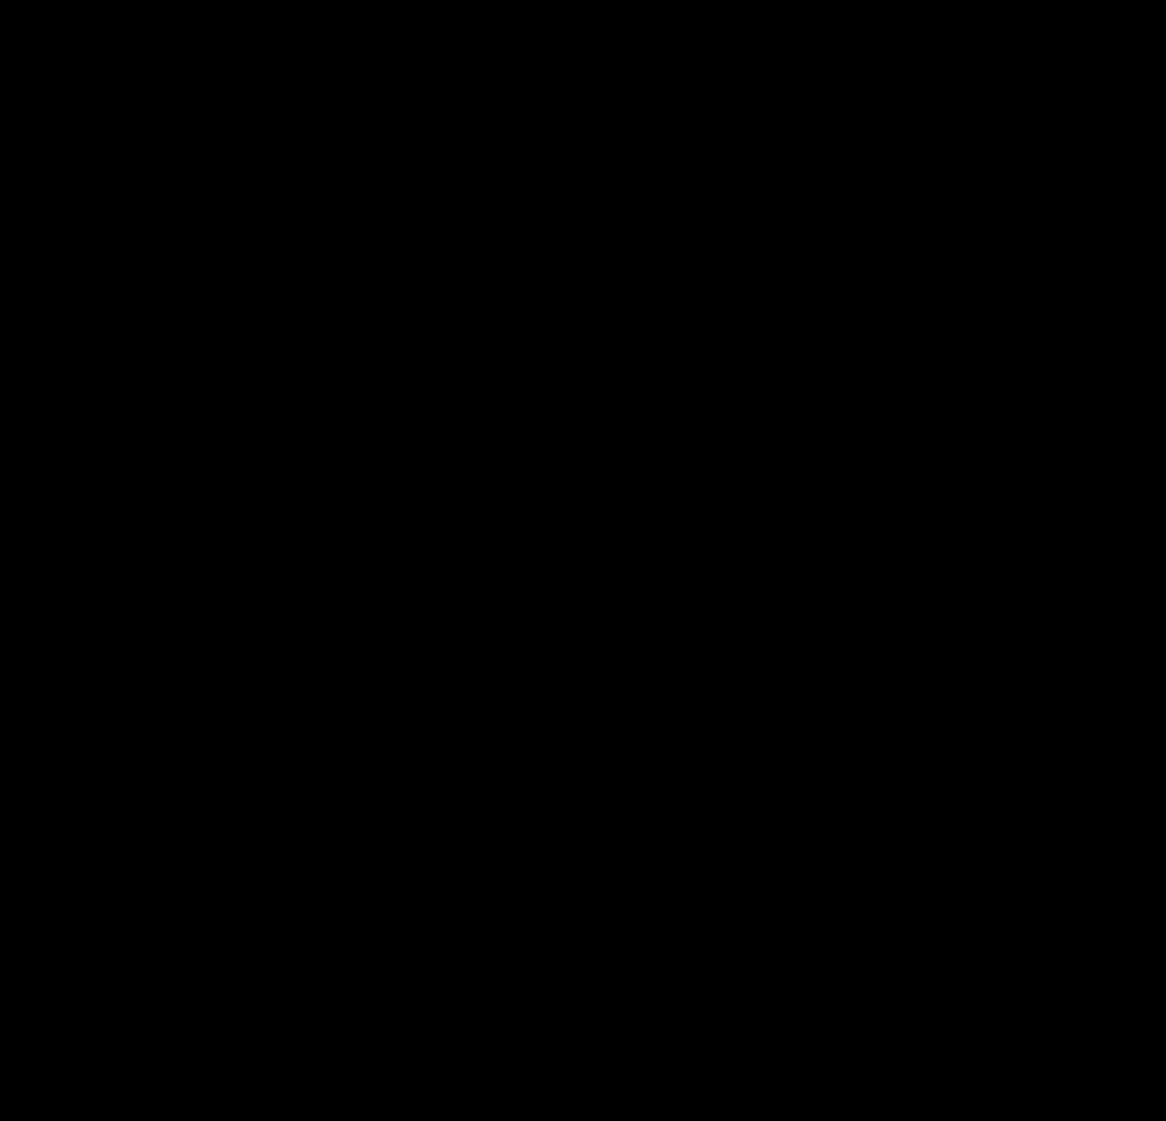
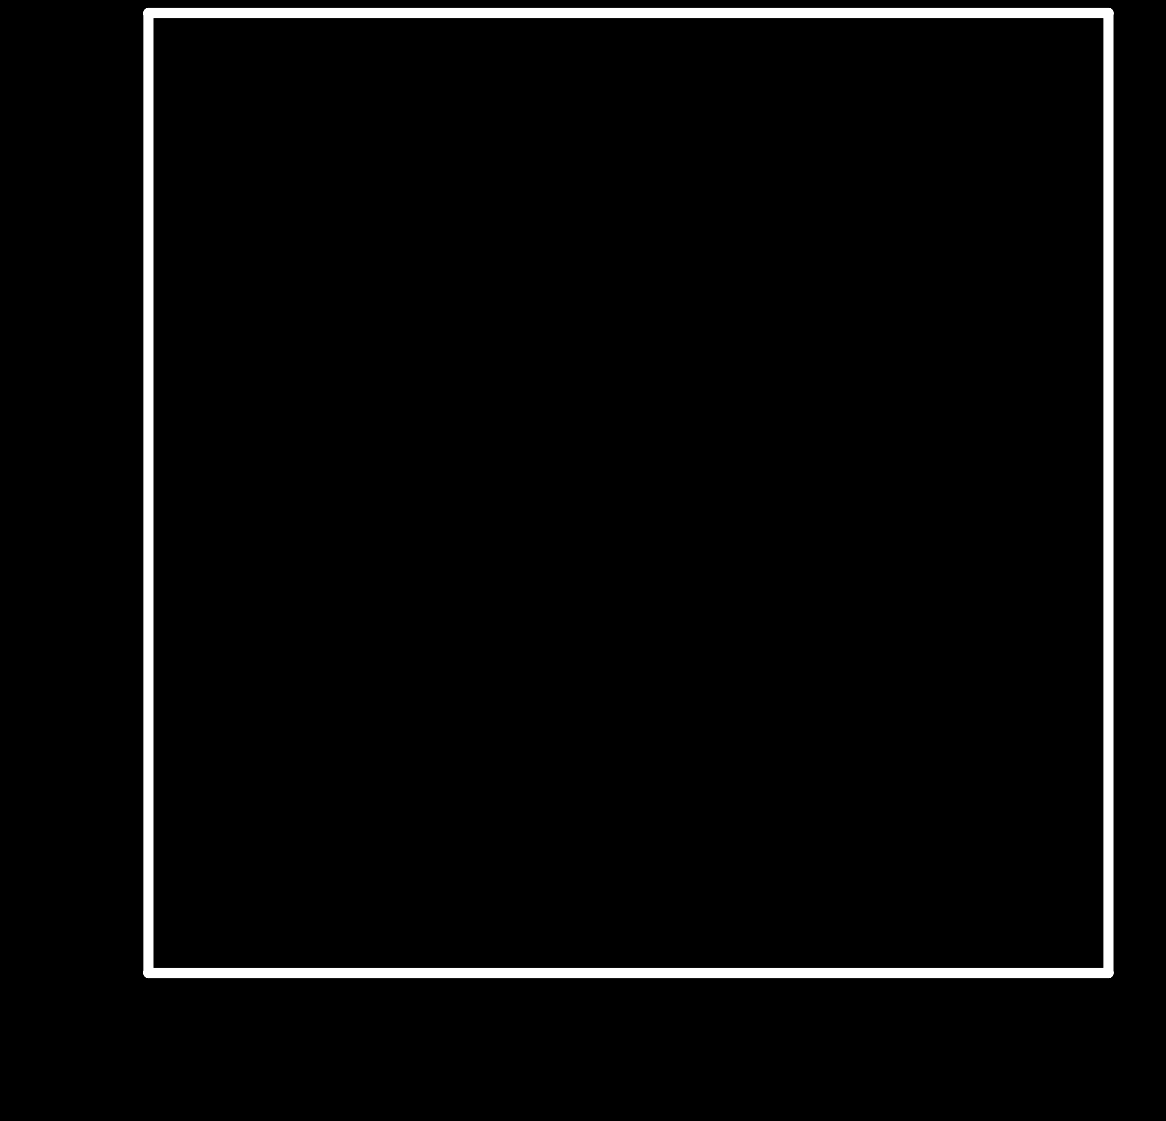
drawing: none -> [143, 7, 1114, 979]

